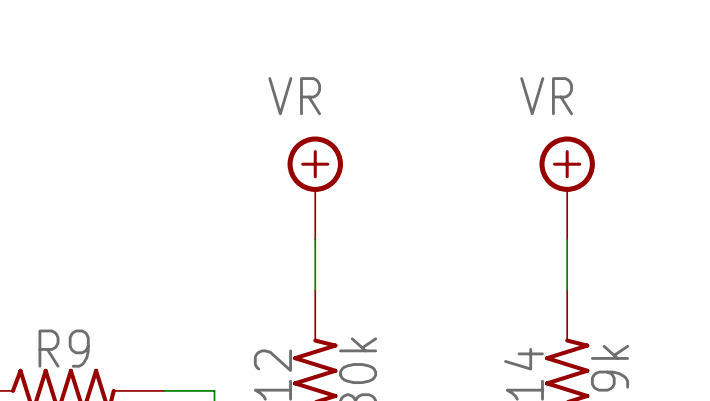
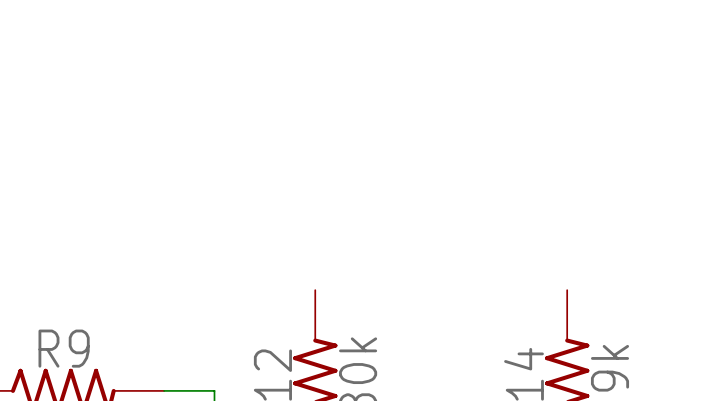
power symbol: VR (315, 188) -> none
power symbol: VR (567, 188) -> none
wire: (315, 239) (315, 290) -> none
wire: (567, 239) (567, 290) -> none

